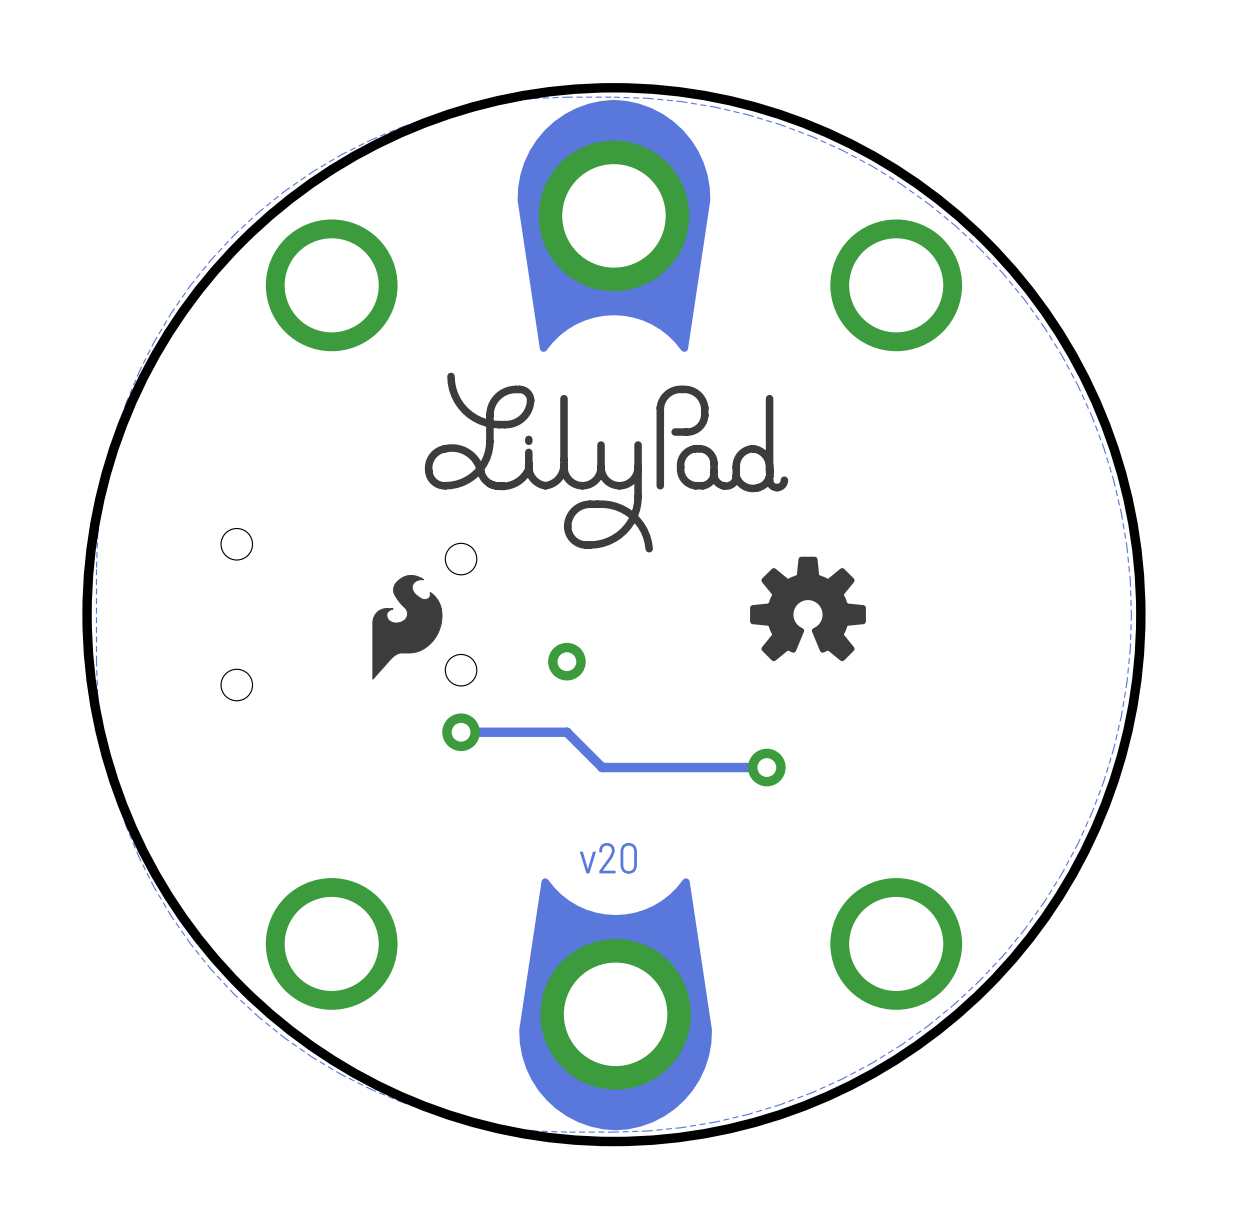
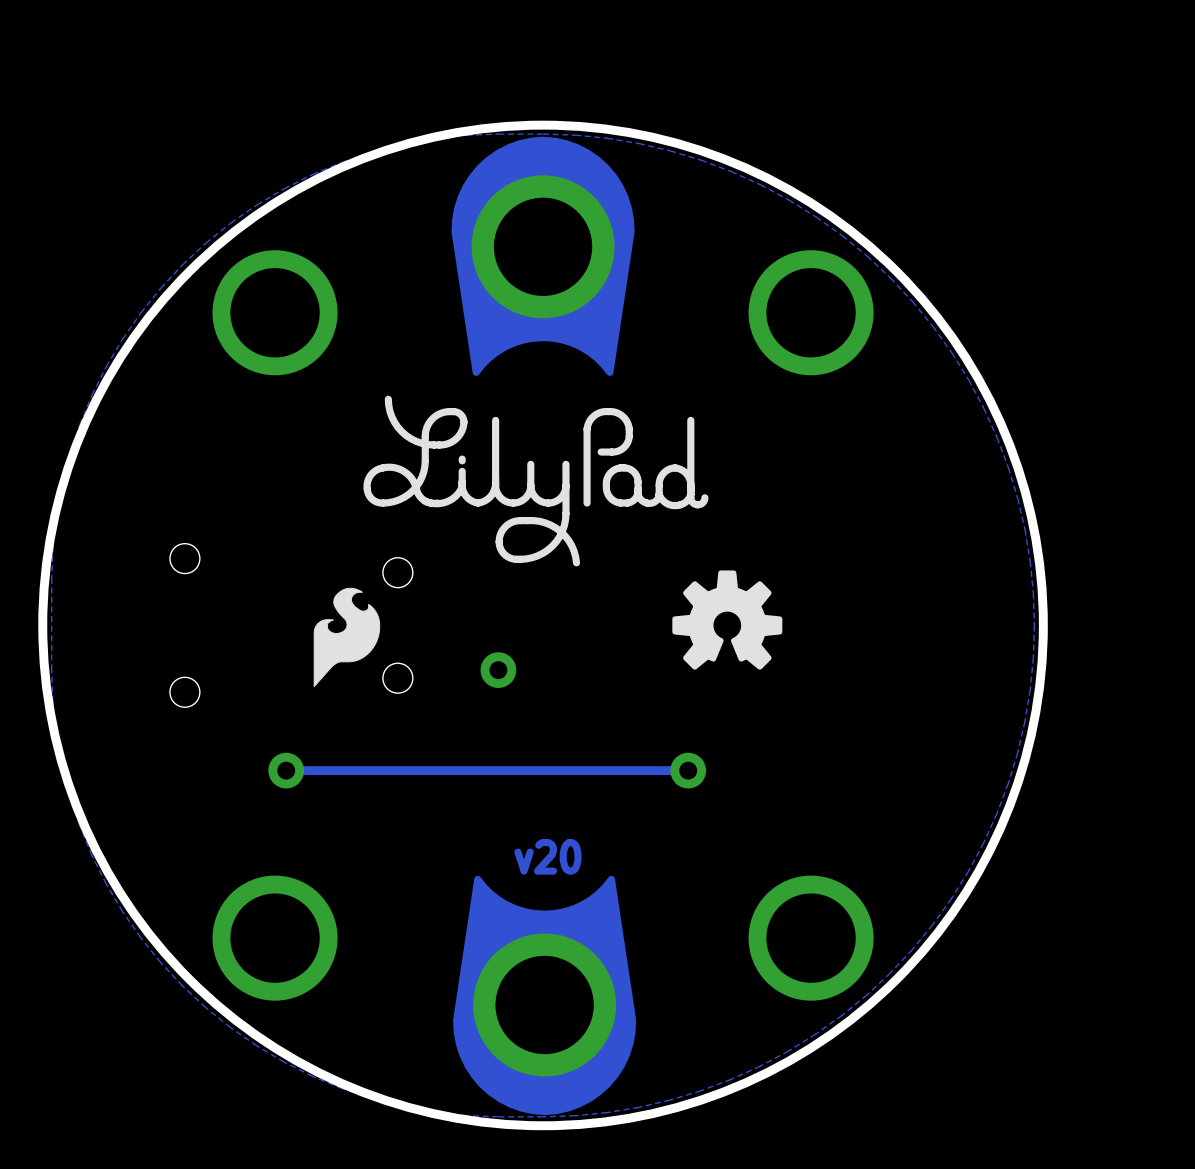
track: (461, 732) (566, 732) (602, 767) -> (286, 770) (531, 770)
via position: (461, 732) -> (286, 770)

